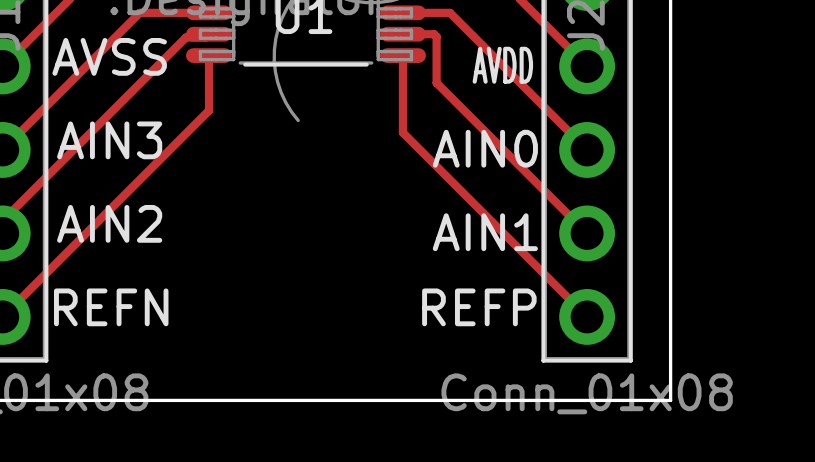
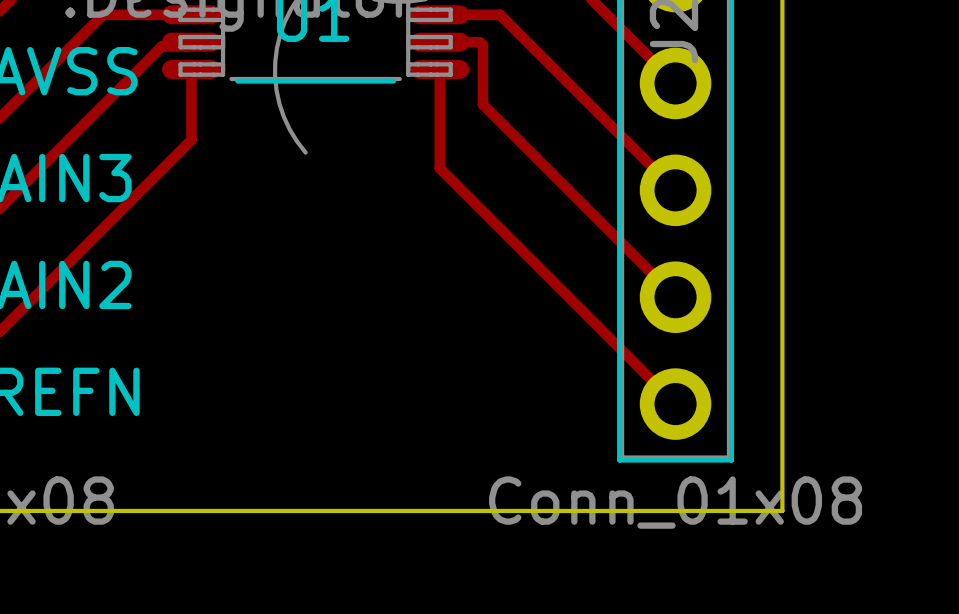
text: AVDD (502, 65) -> none
text: AIN0 (485, 148) -> none
text: AIN1 (485, 232) -> none
text: REFP (479, 307) -> none

